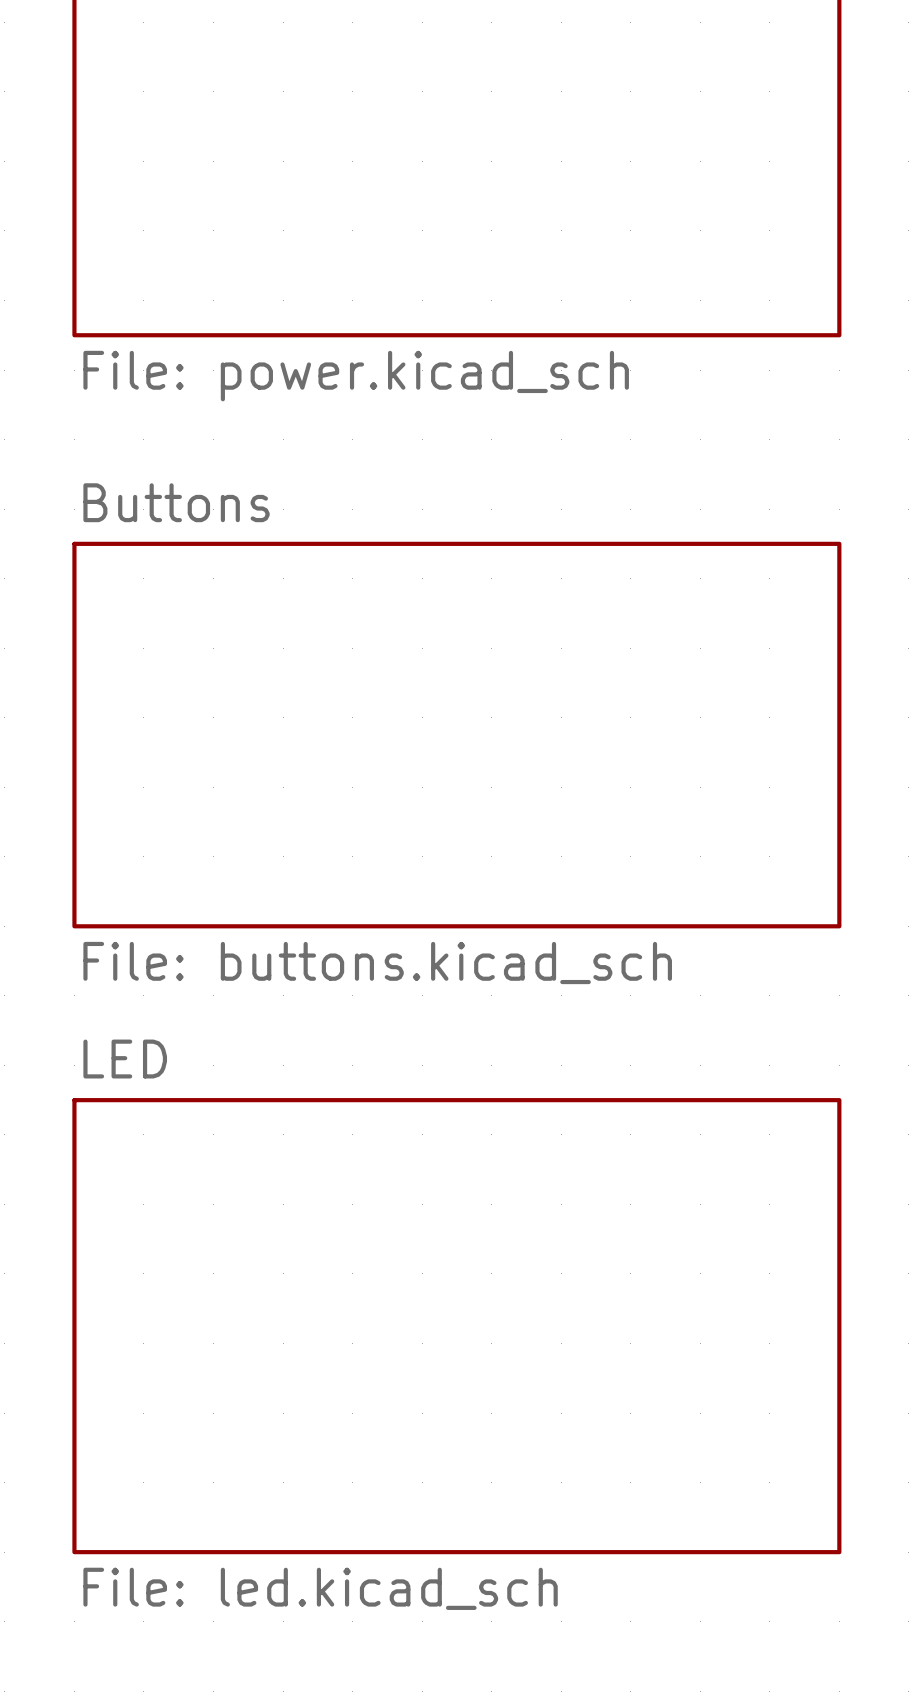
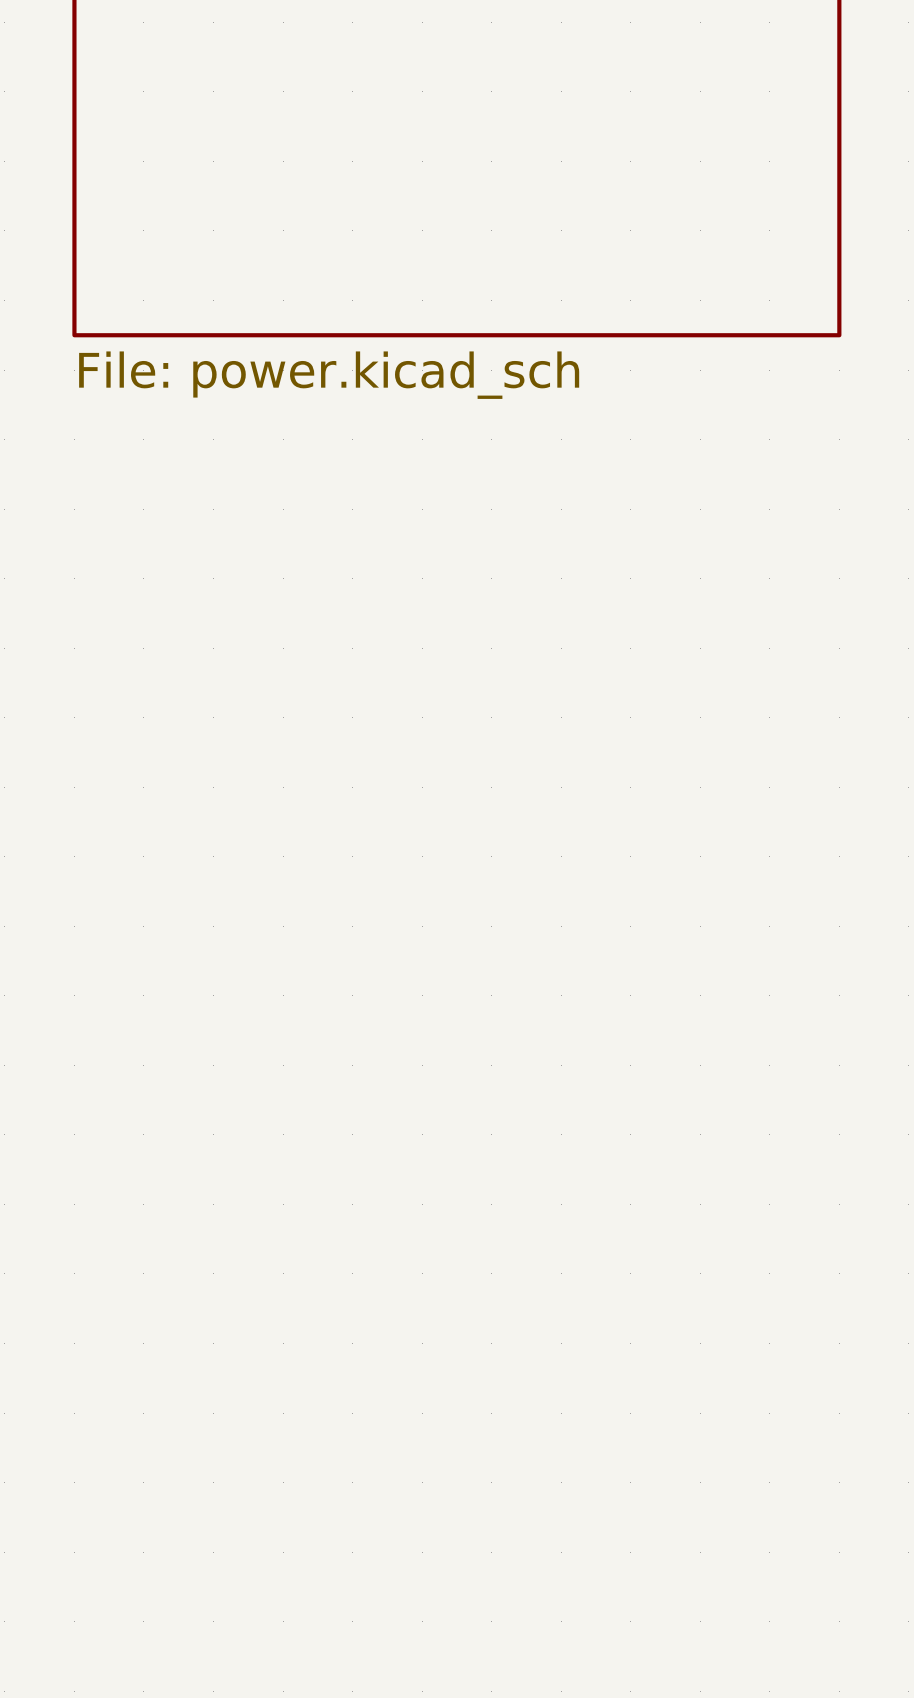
sheet Buttons: File: buttons.kicad_sch (456, 735) -> none
sheet LED: File: led.kicad_sch (456, 1326) -> none

